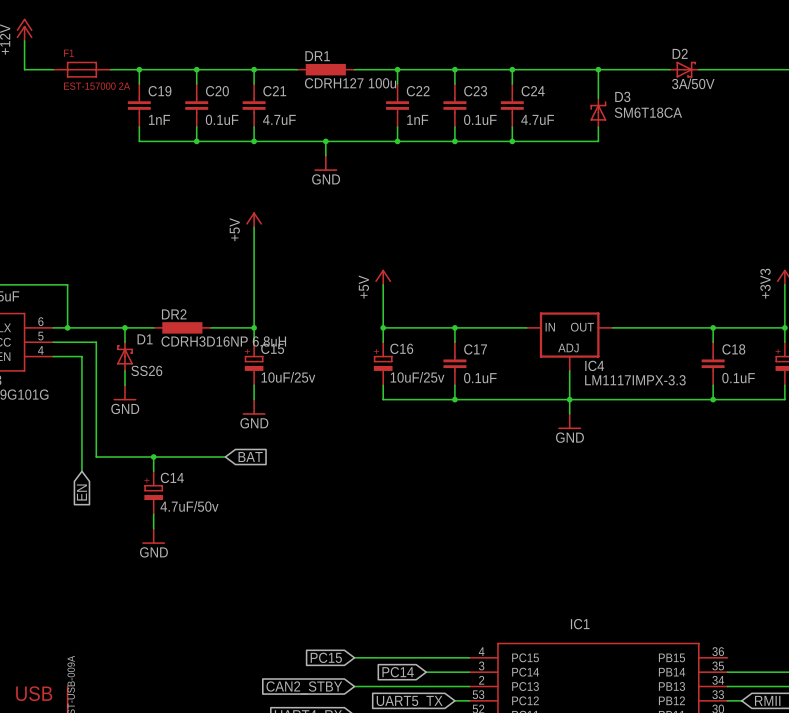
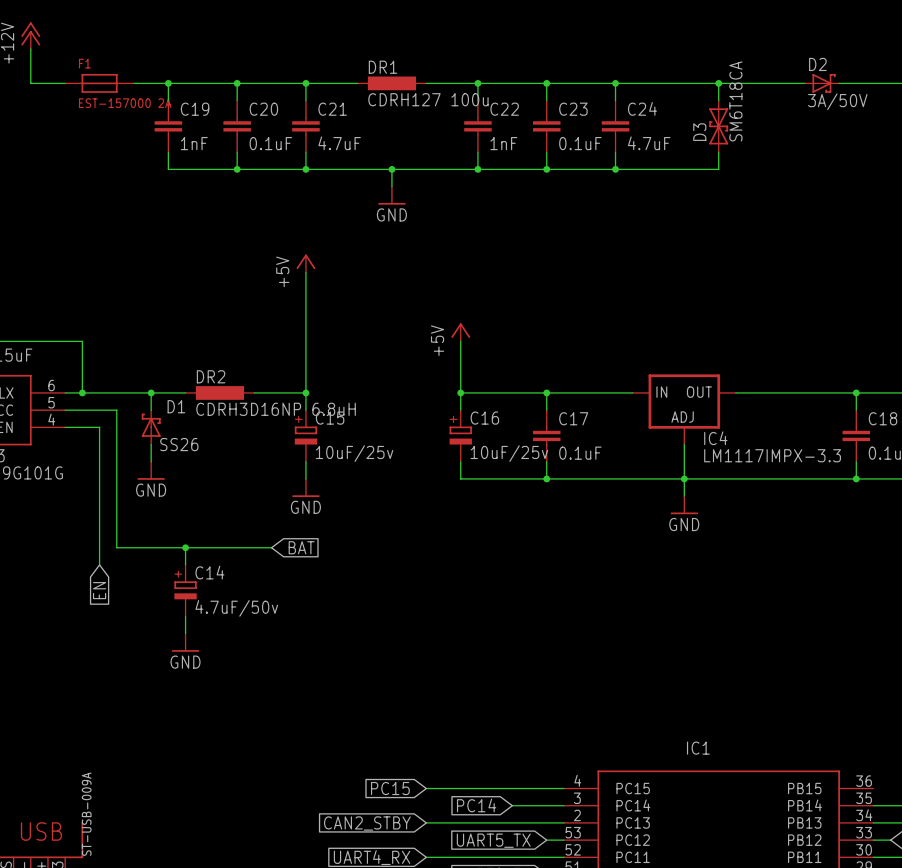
D3 name position: D3 (622, 96) -> D3 (699, 132)
D3 symbol: [590, 98, 607, 128] -> [709, 100, 729, 153]
D3 value position: SM6T18CA (648, 112) -> SM6T18CA (735, 101)

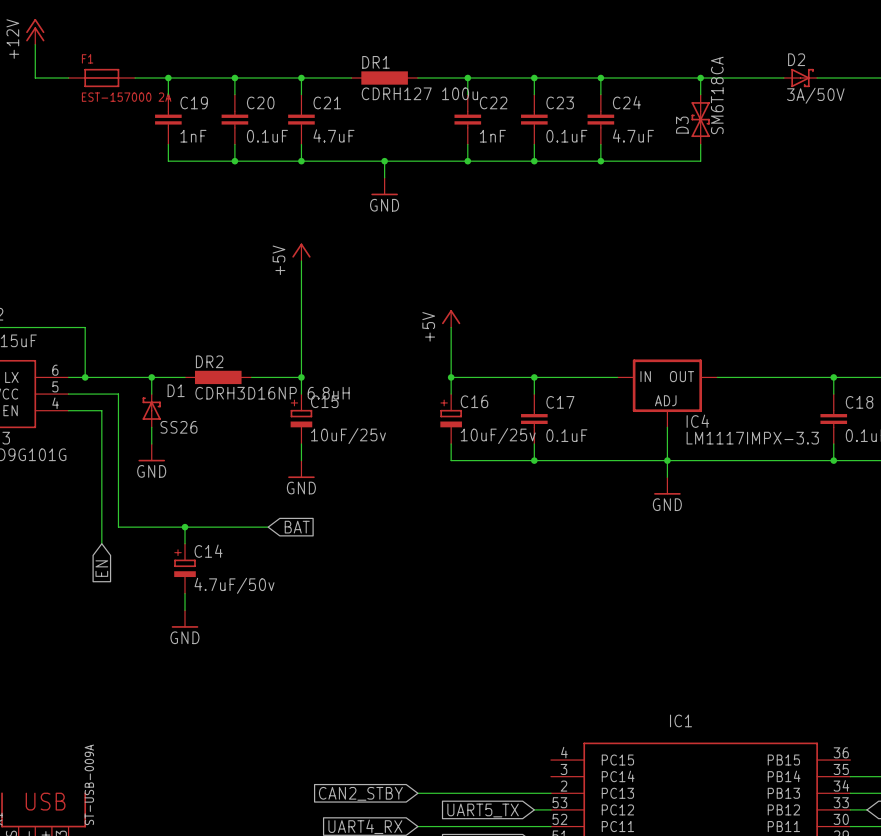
global label: PC15 (390, 788) -> none
wire: (426, 788) (563, 788) -> none
global label: PC14 (476, 805) -> none
wire: (512, 805) (563, 805) -> none

